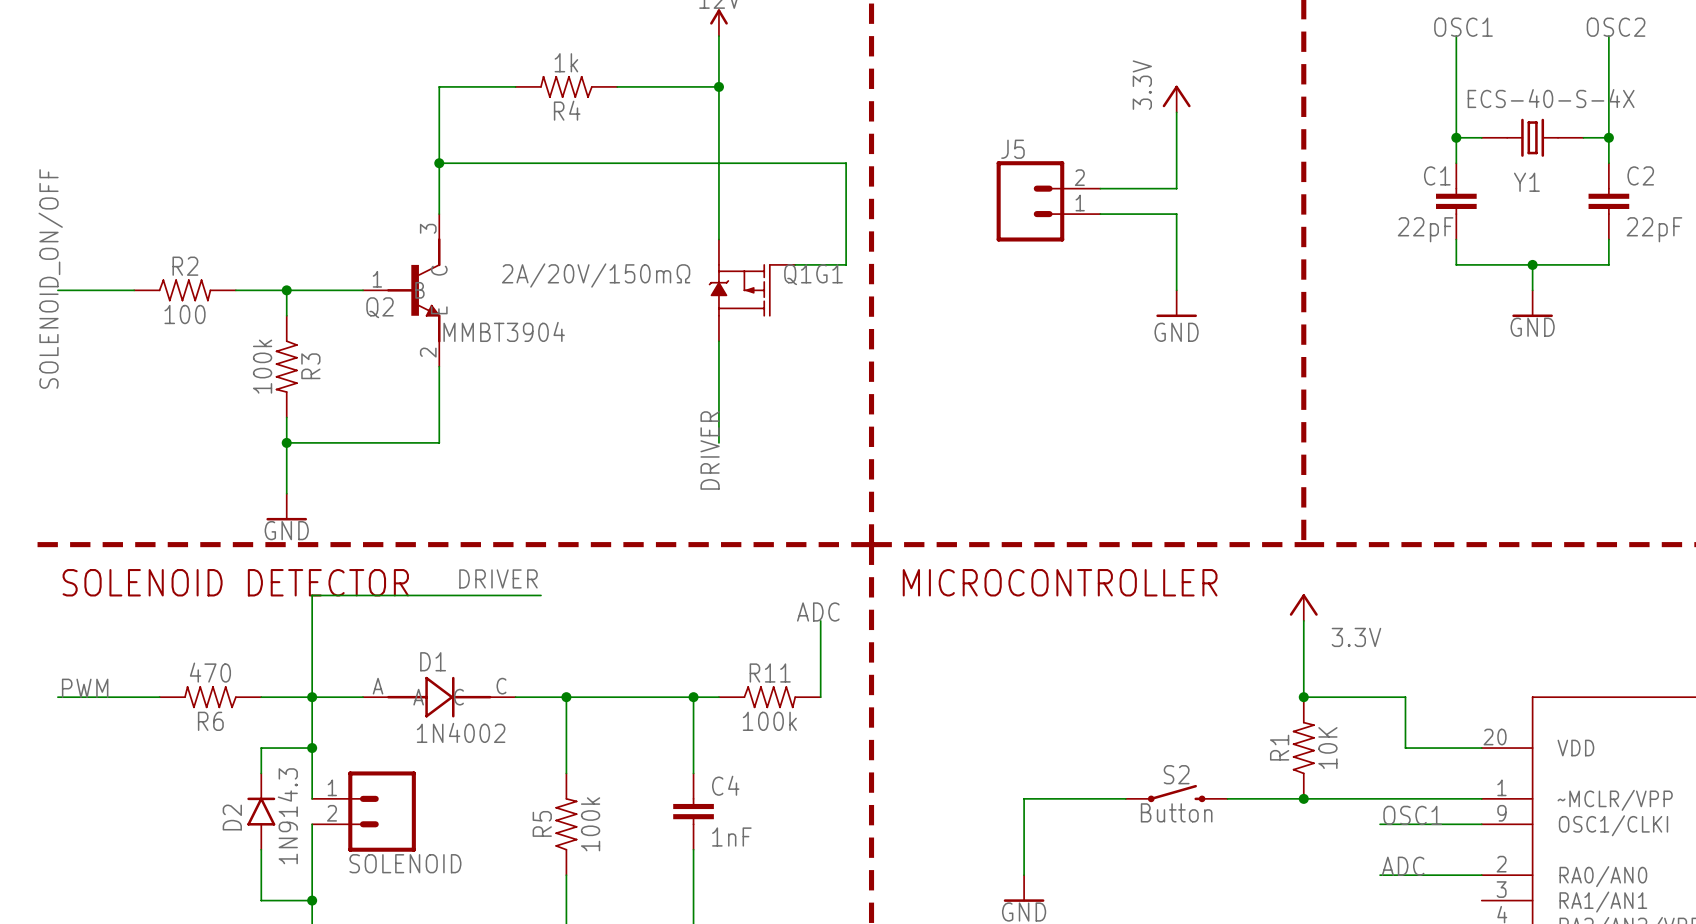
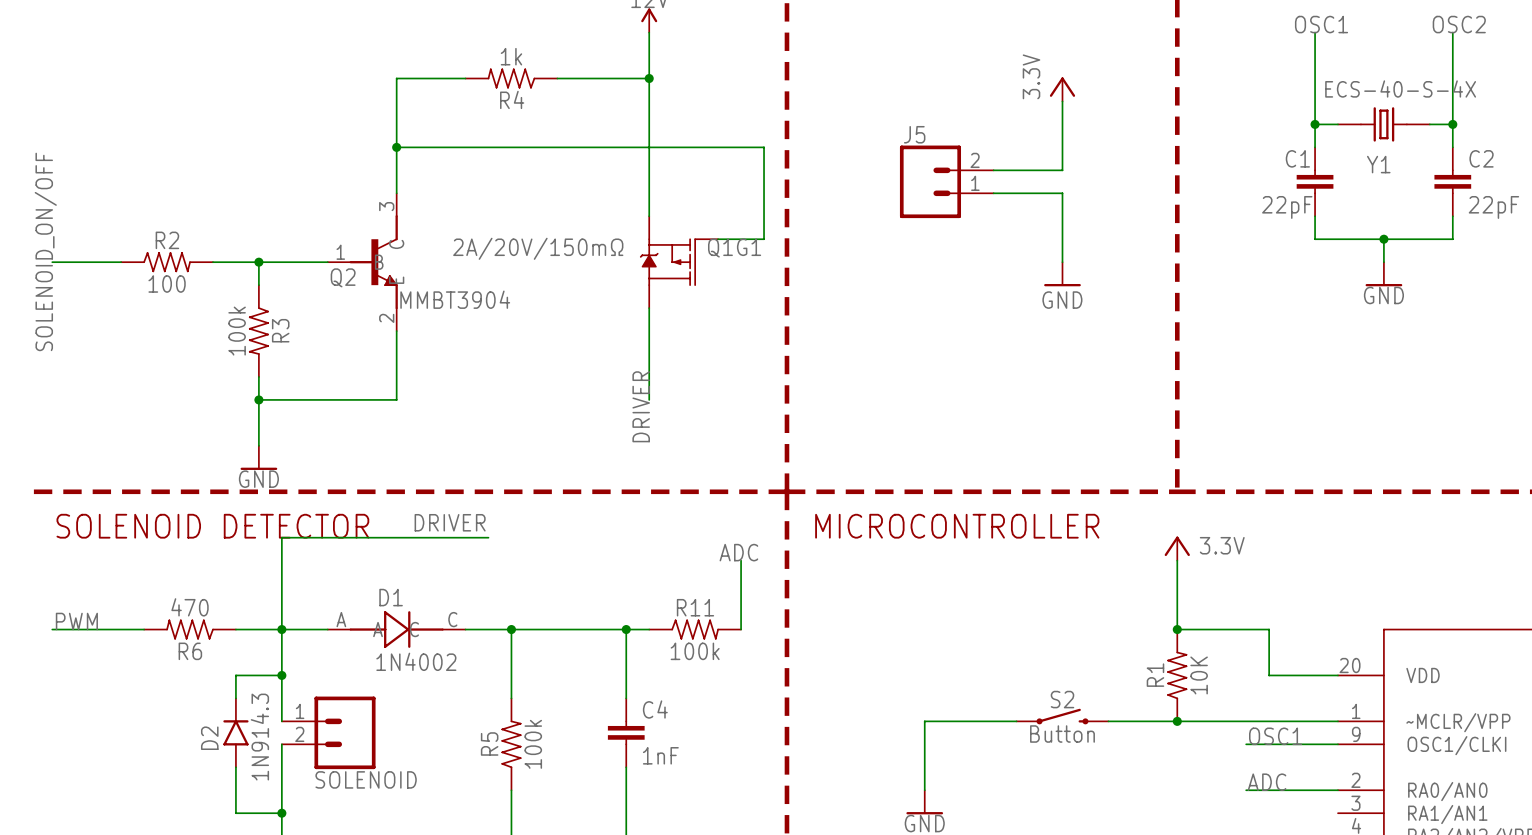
power symbol text: none -> 3.3V (1222, 545)
label: 3.3V (1356, 637) -> none

